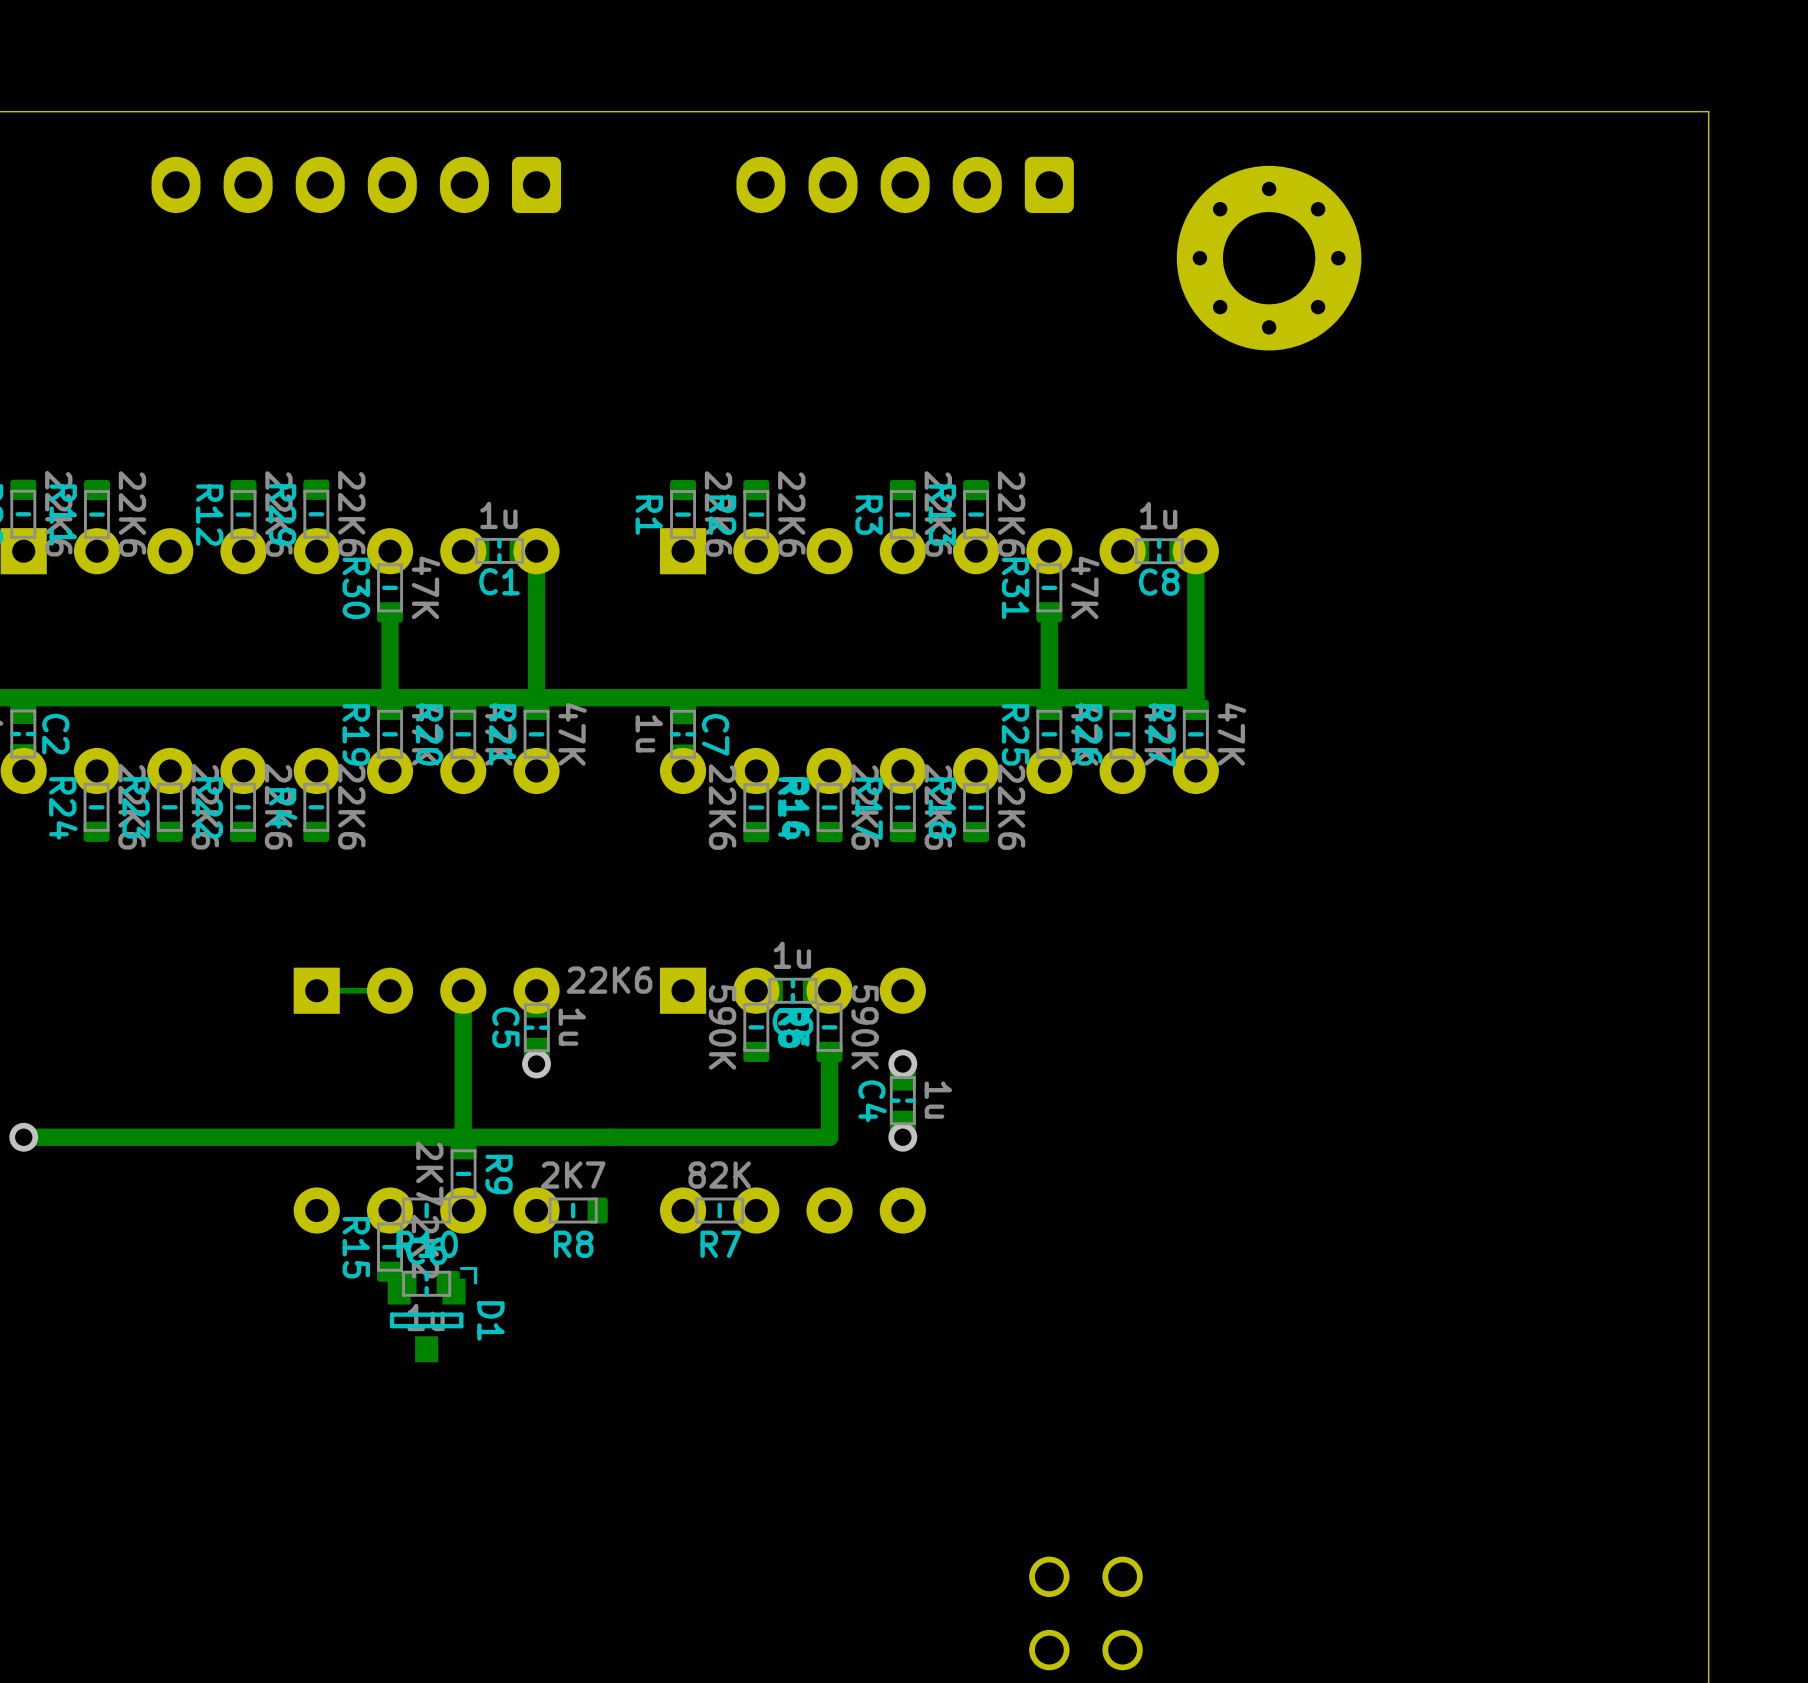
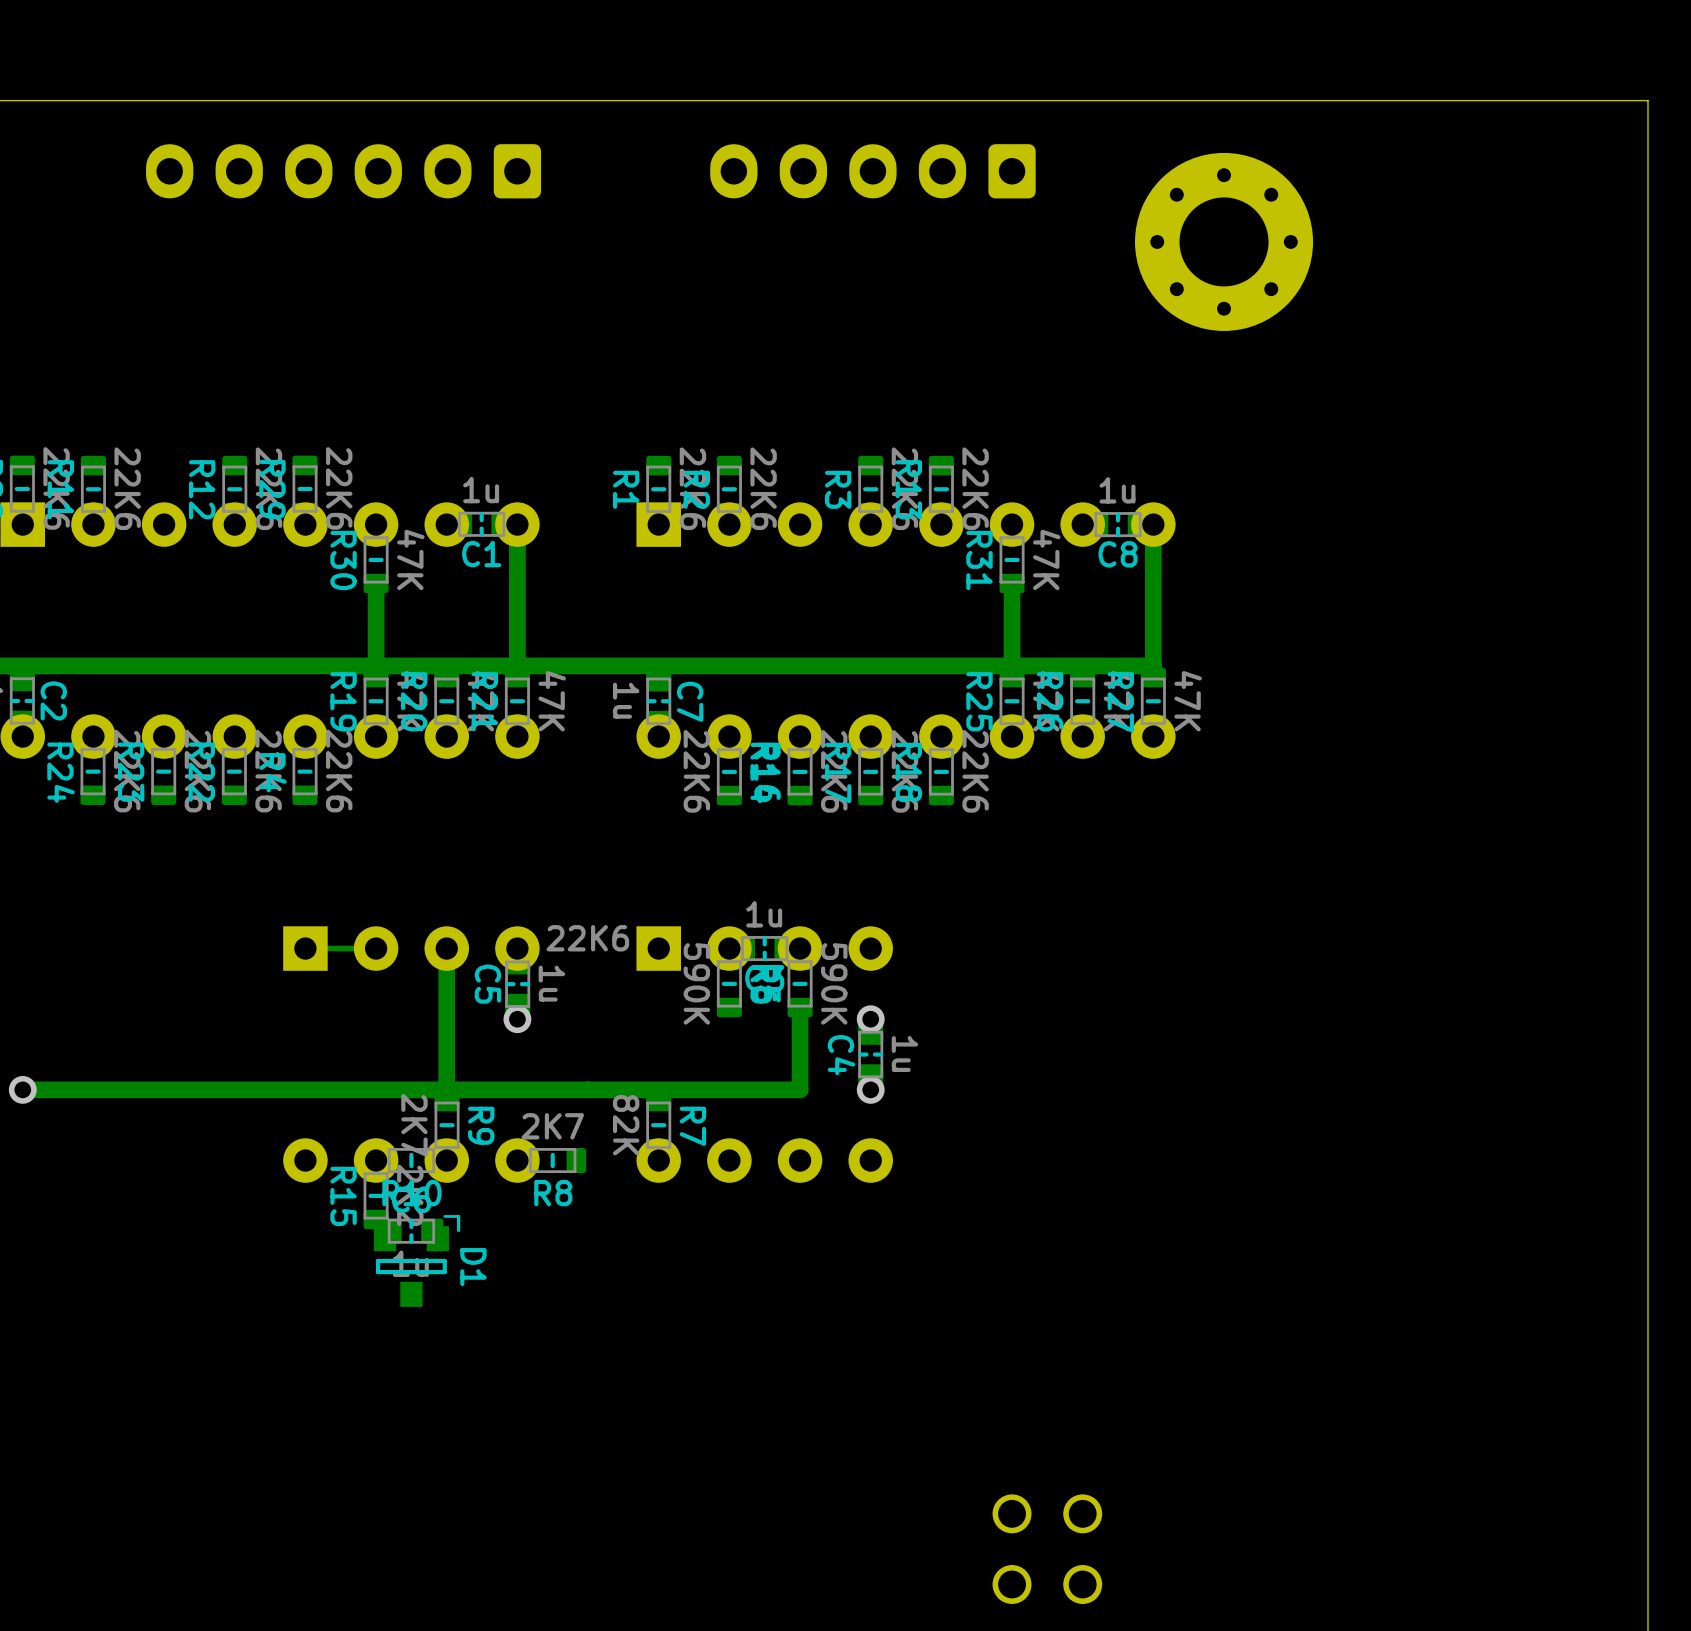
R7 rotation: 0° (719, 1210) -> 90° clockwise (658, 1125)
R7 position: (719, 1210) -> (658, 1125)

